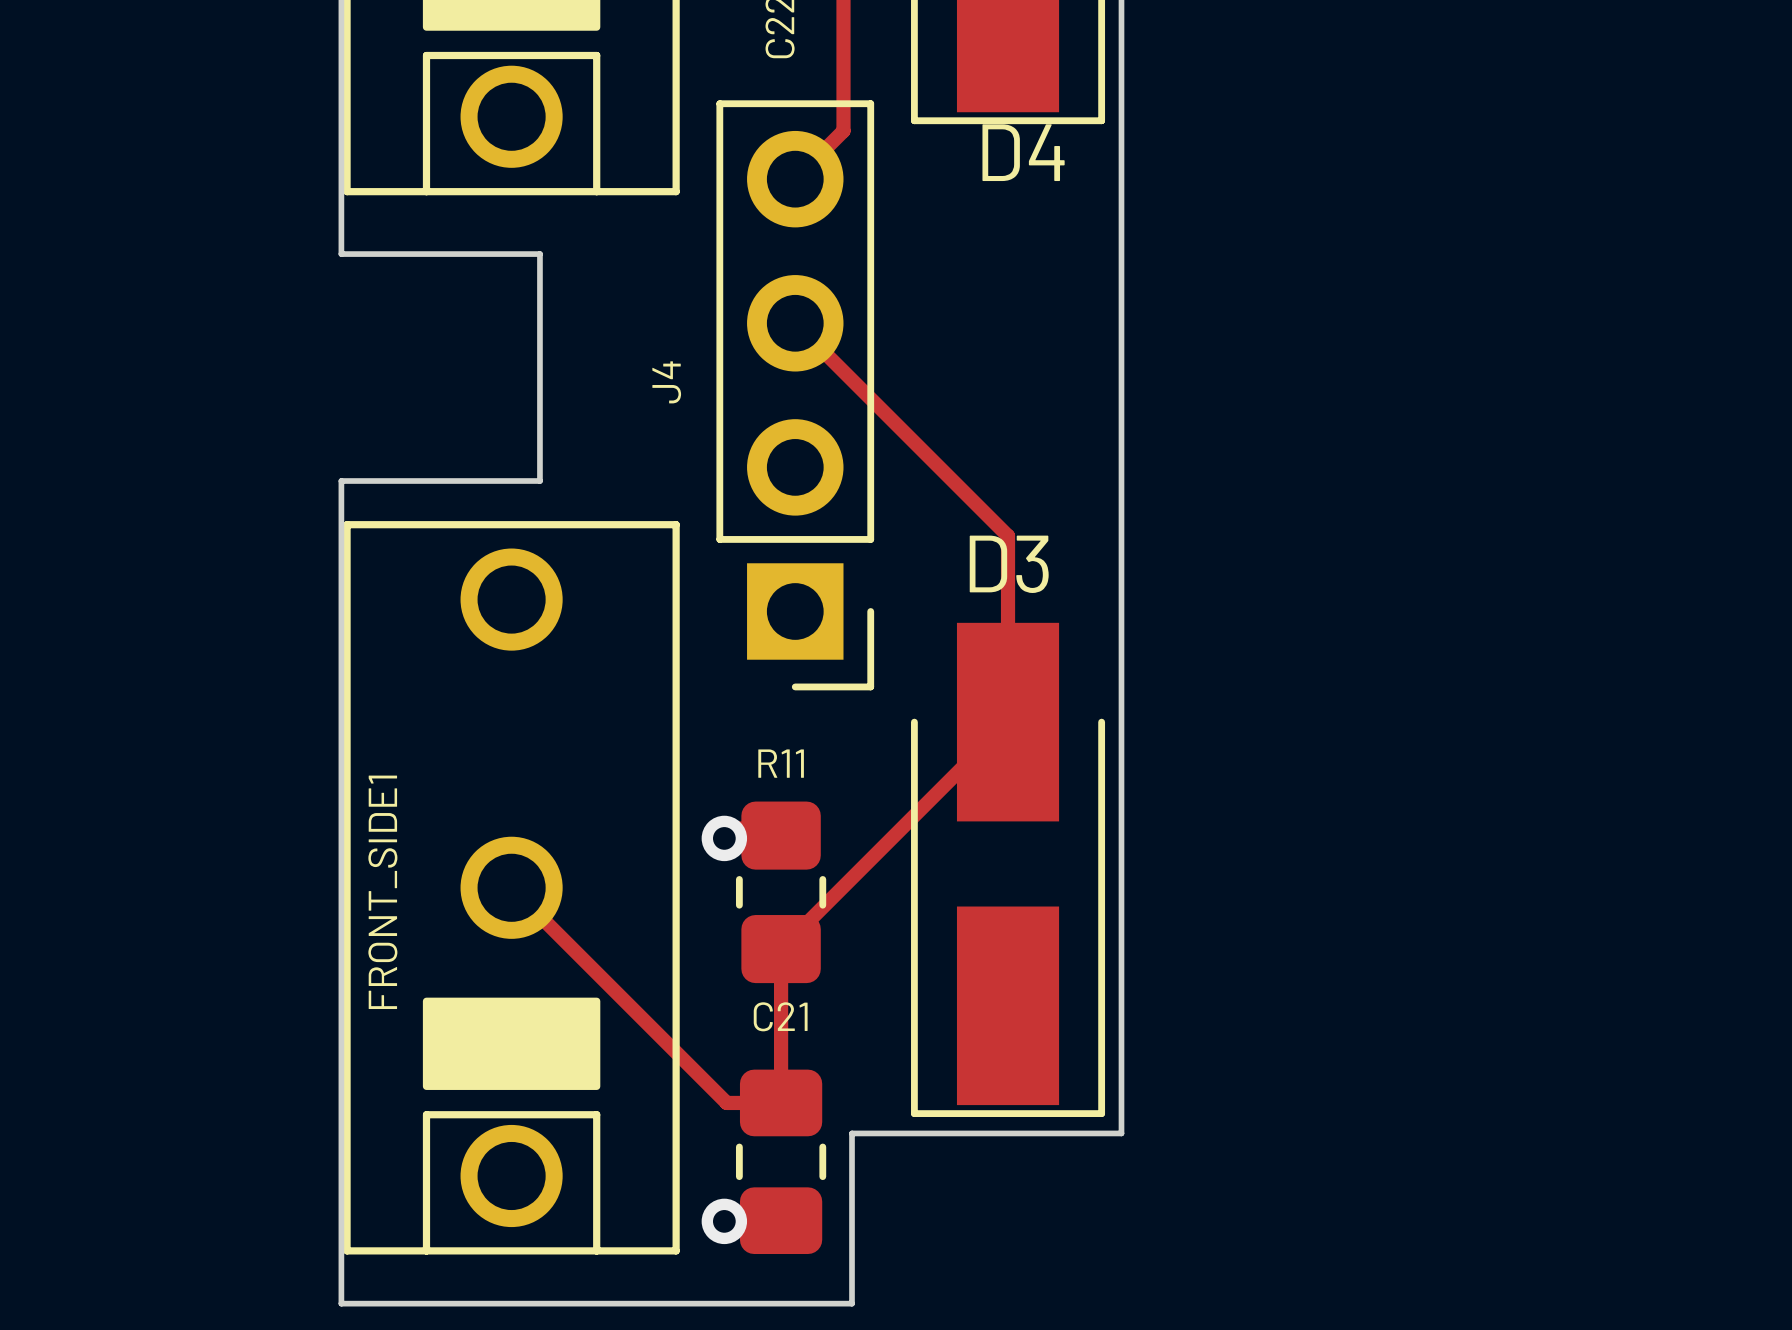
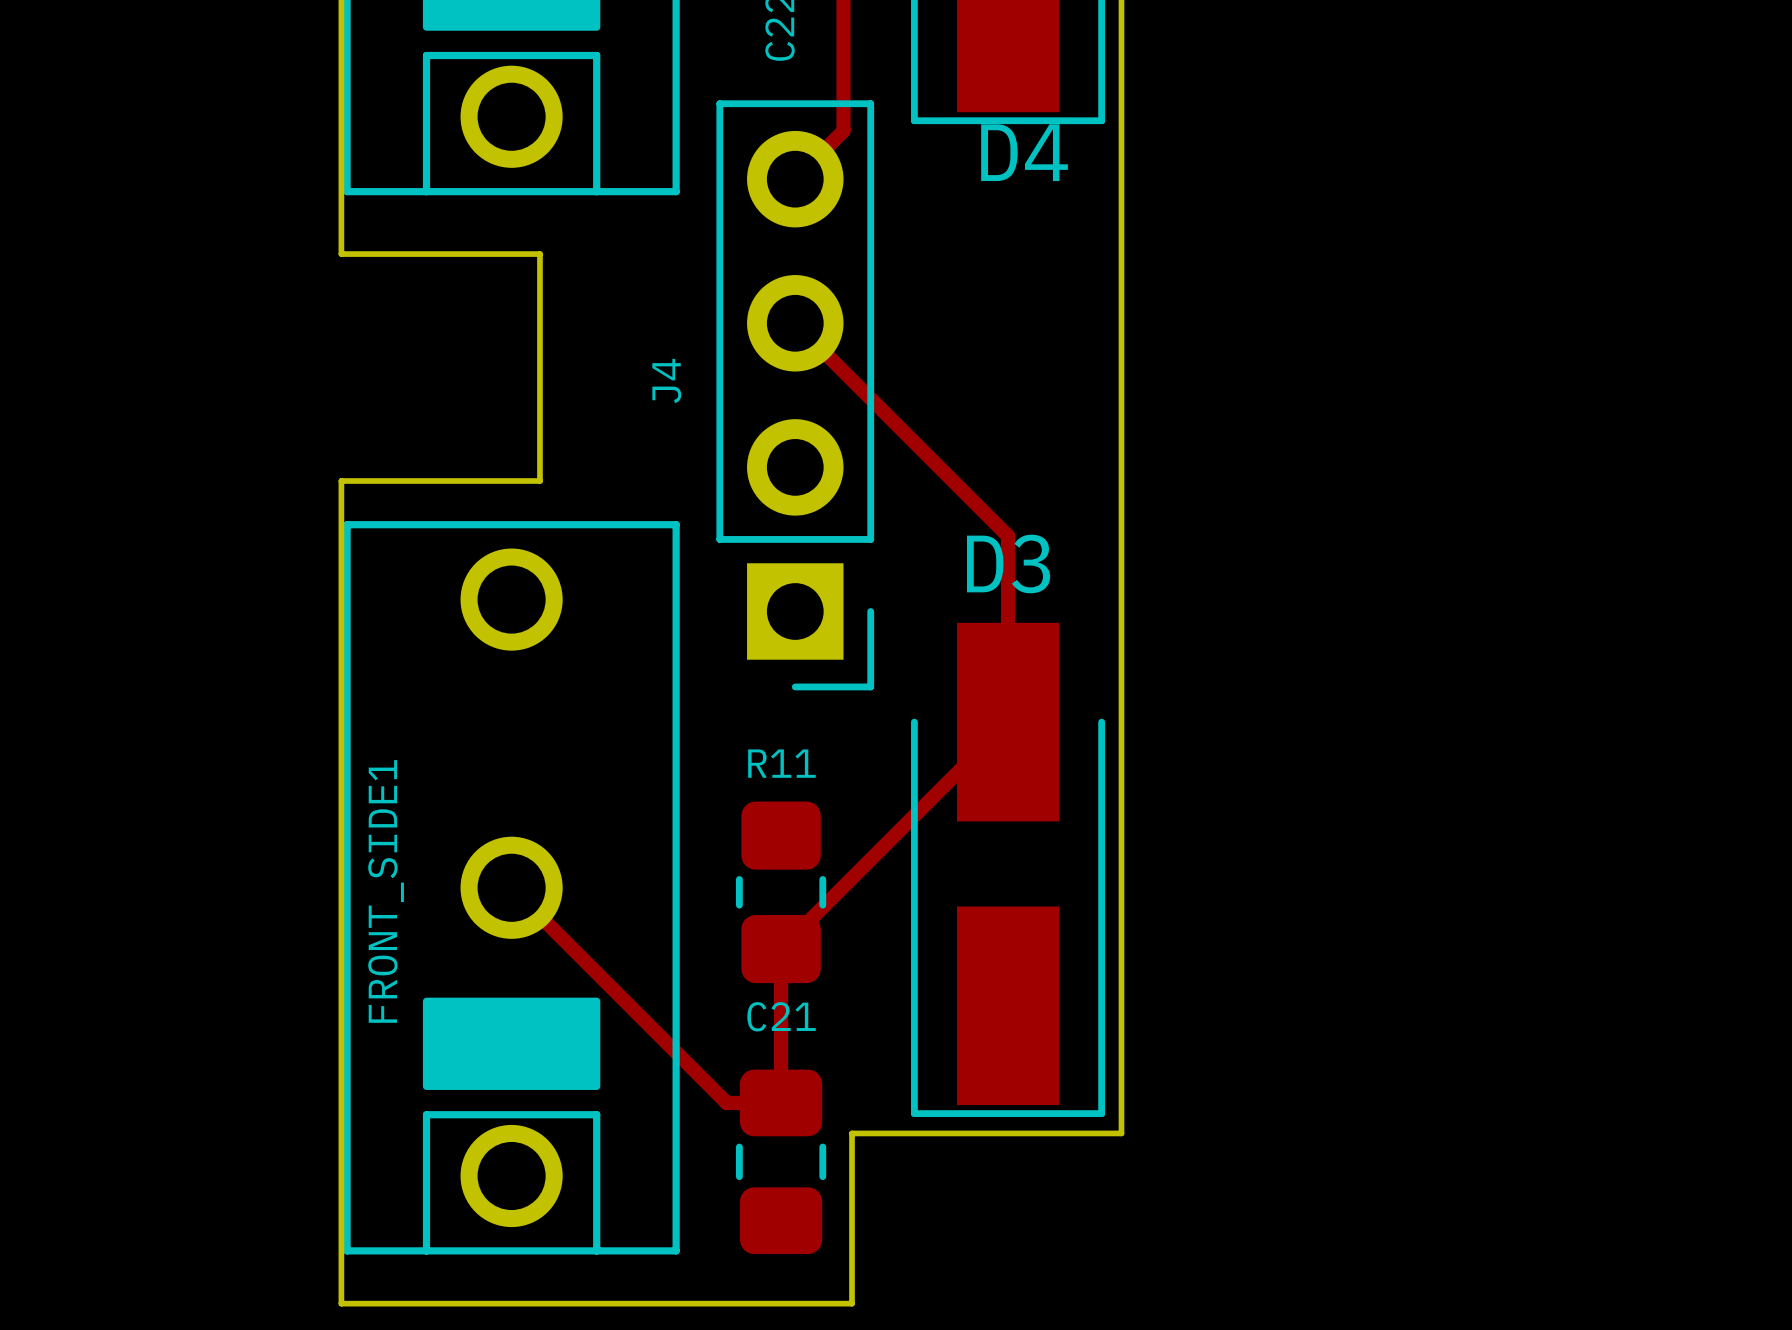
via: (724, 838) -> none
via: (724, 1221) -> none

